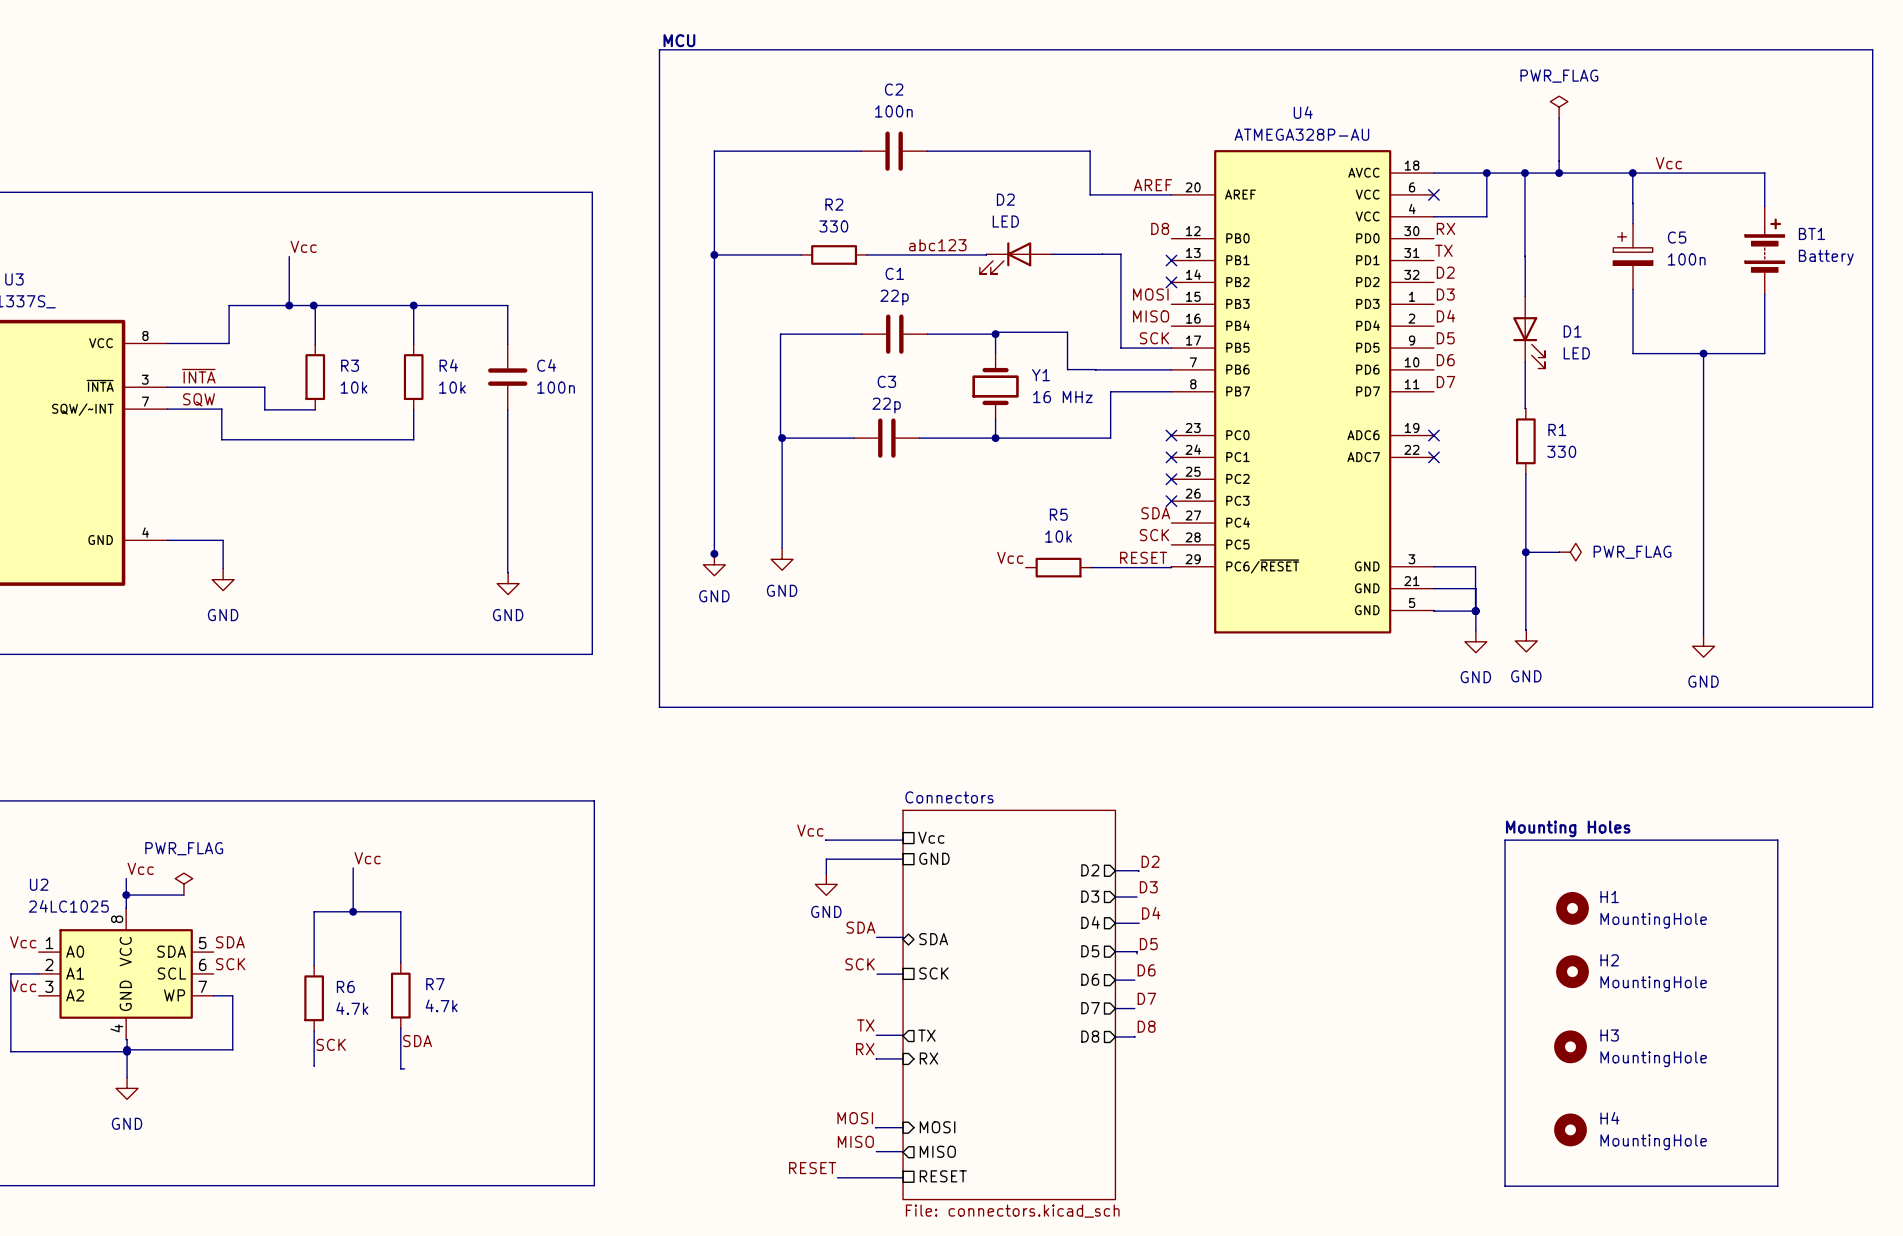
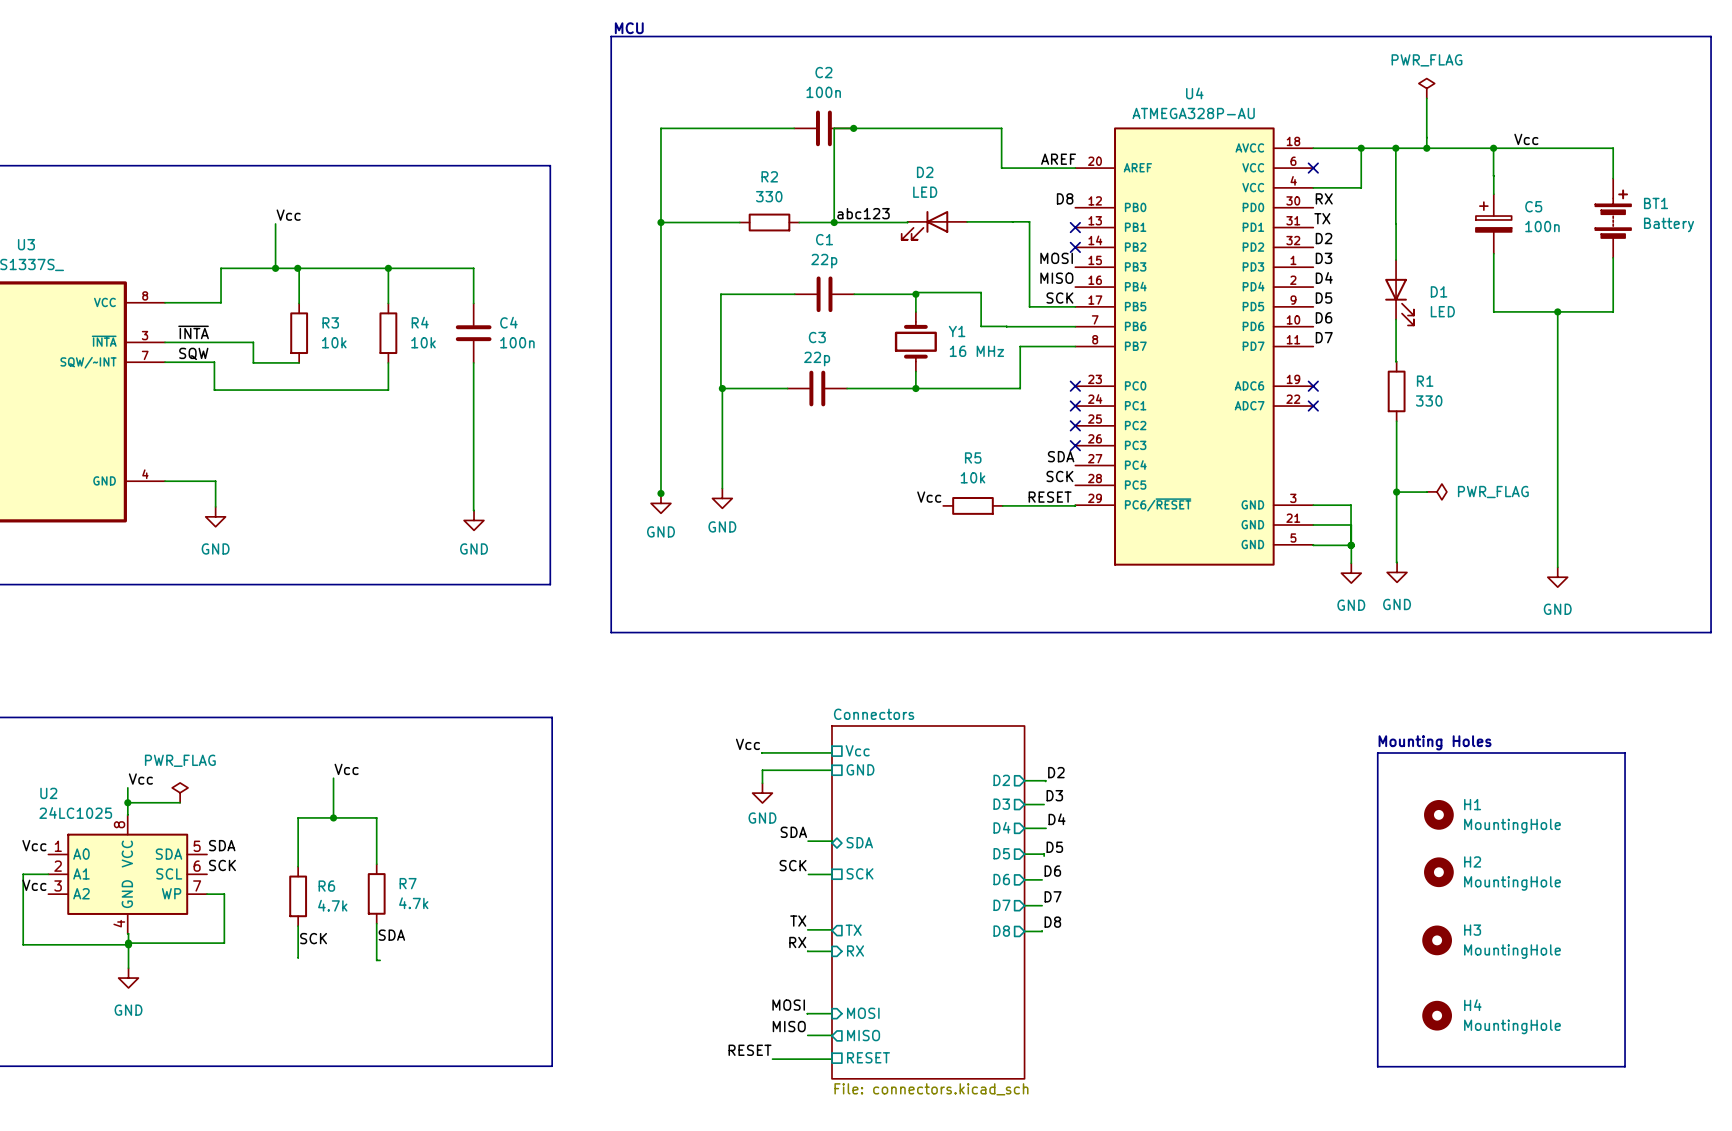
wire: none -> (853, 128) (834, 128) (834, 222)
junction: none -> (853, 128)
junction: none -> (834, 222)

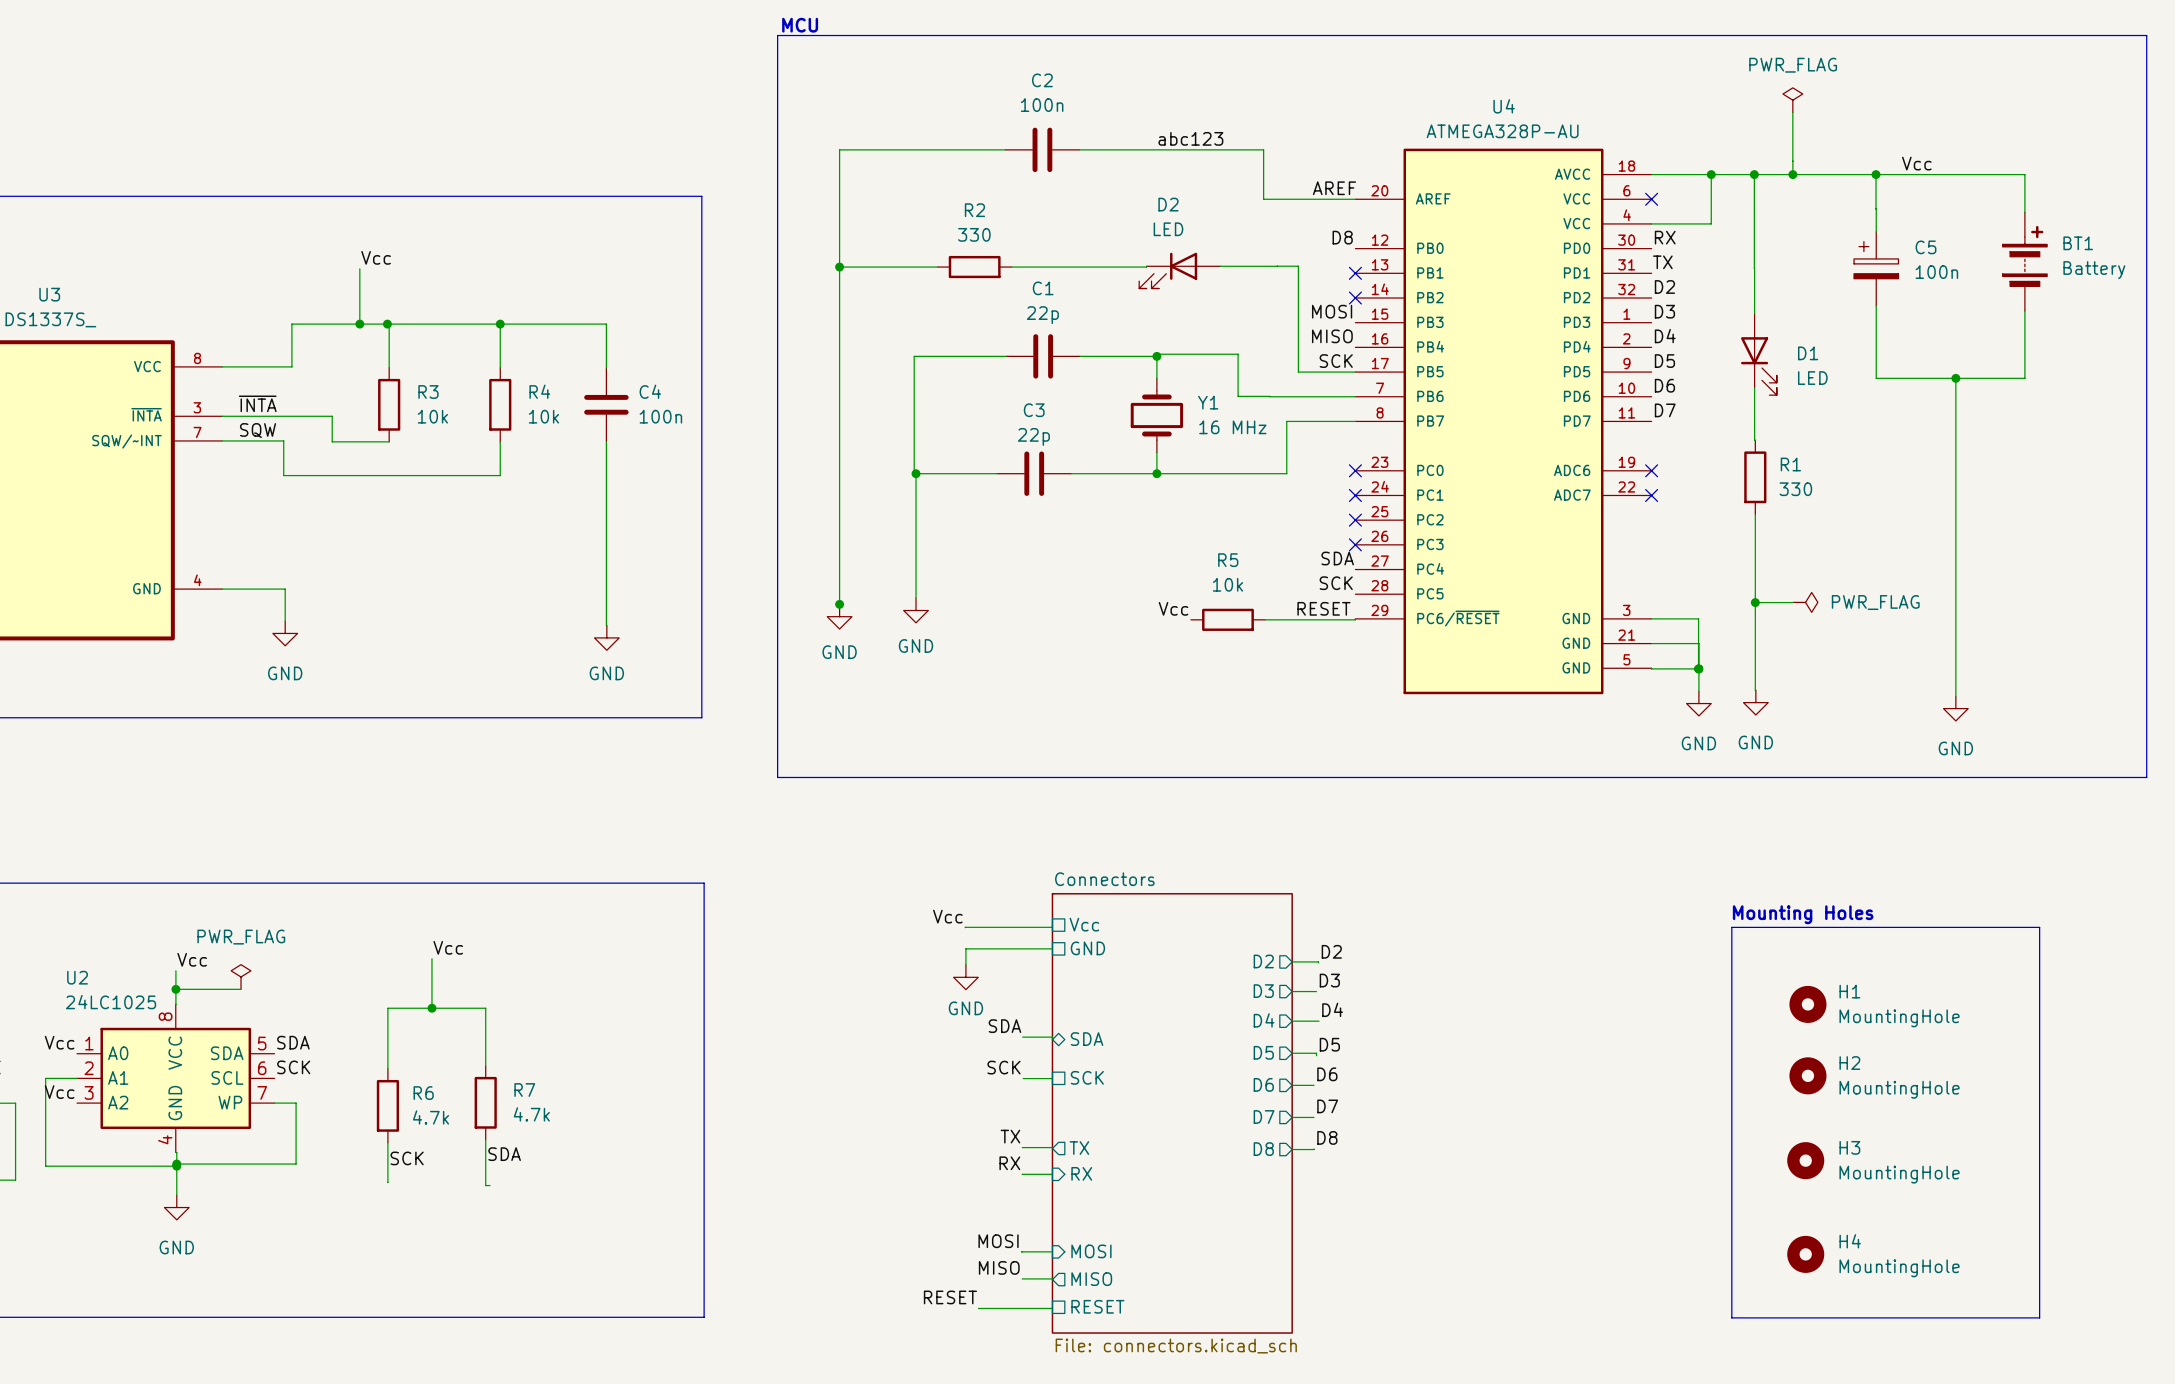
wire: (853, 128) (834, 128) (834, 222) -> none
junction: (853, 128) -> none
label position: abc123 (863, 213) -> abc123 (1190, 138)
junction: (834, 222) -> none

